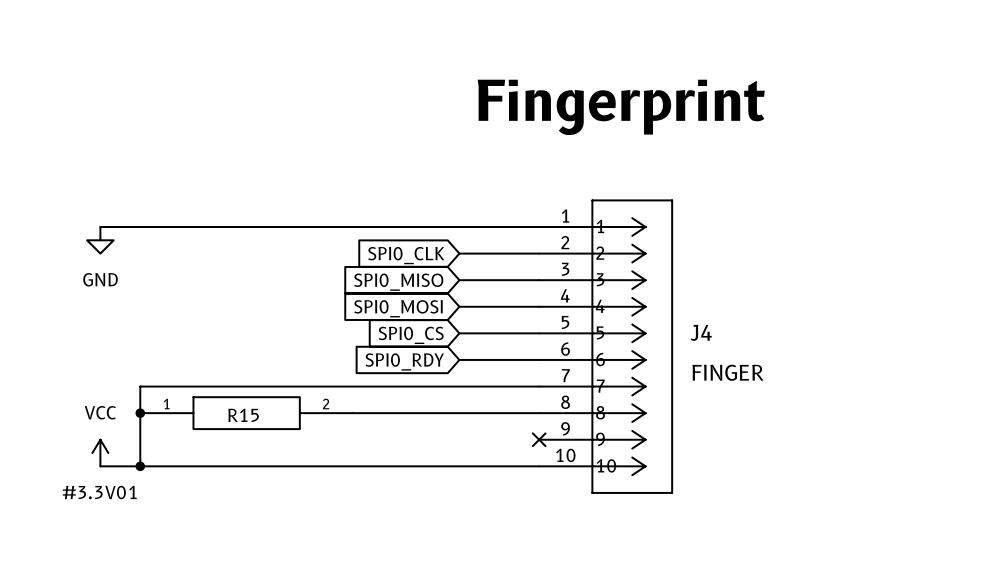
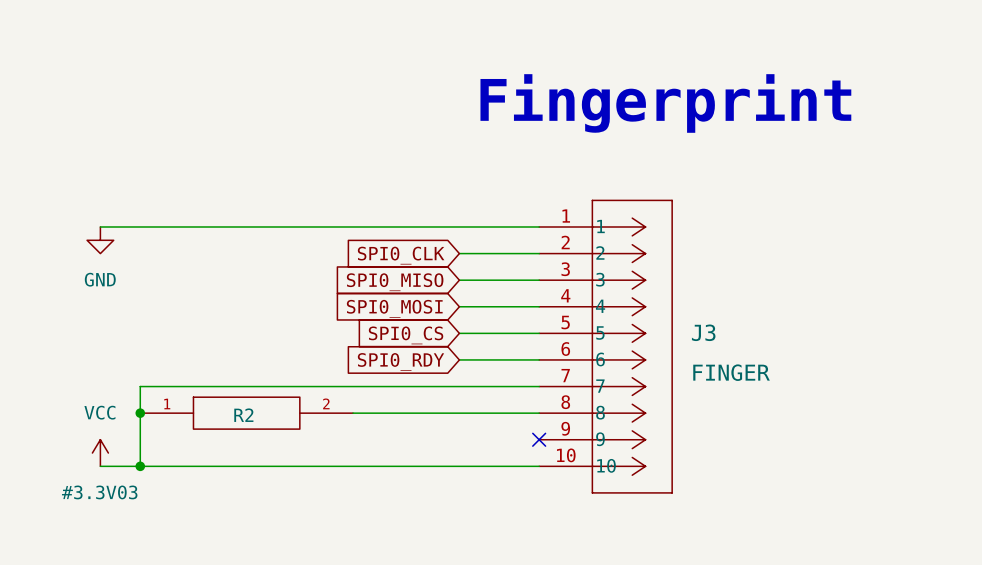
J4 name: J4 (701, 332) -> J3 (703, 332)
R15 name: R15 (243, 415) -> R2 (243, 415)
#3.3V01 name: #3.3V01 (99, 492) -> #3.3V03 (99, 492)

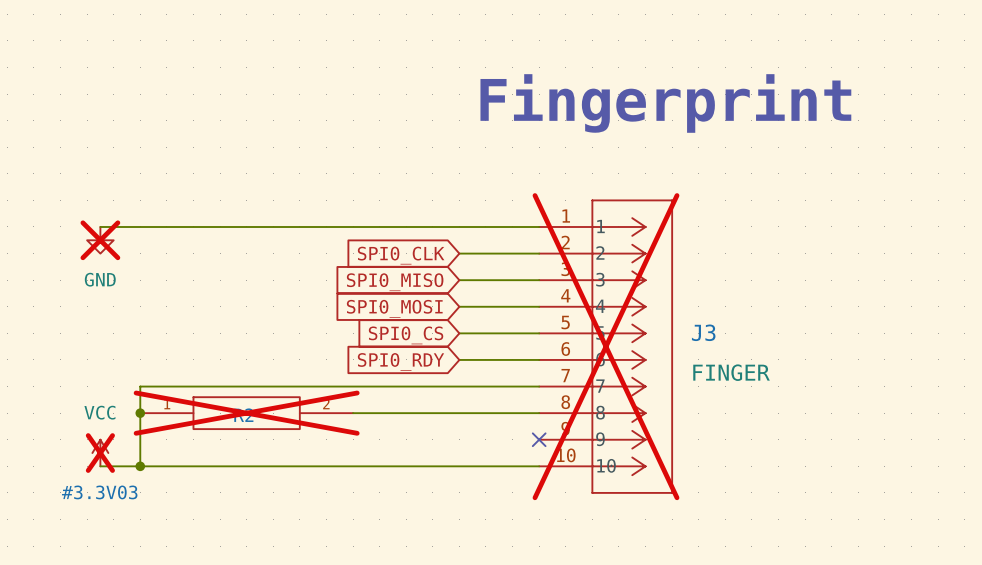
power symbol do-not-place cross: none -> (100, 240)
J3 do-not-place cross: none -> (606, 346)
R2 do-not-place cross: none -> (246, 413)
#3.3V03 do-not-place cross: none -> (100, 453)

